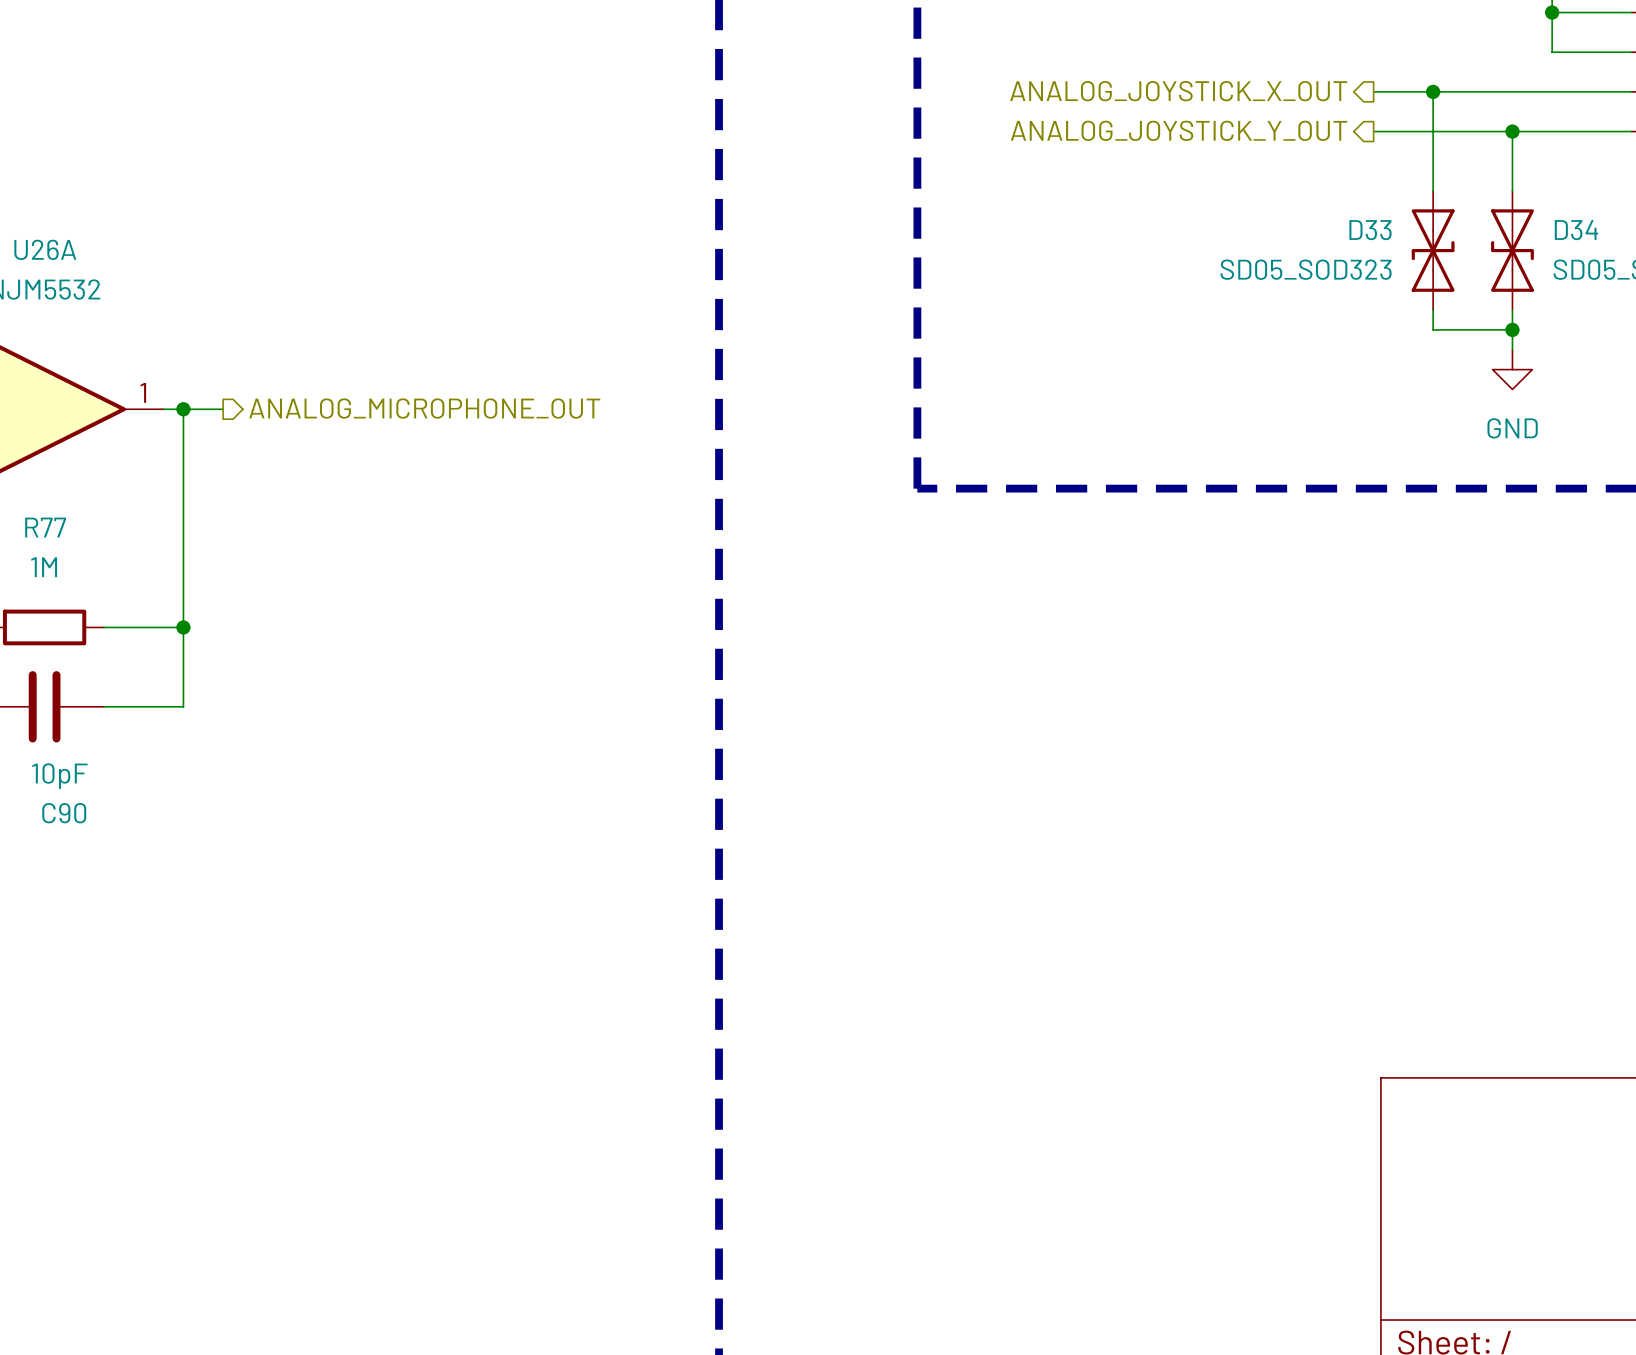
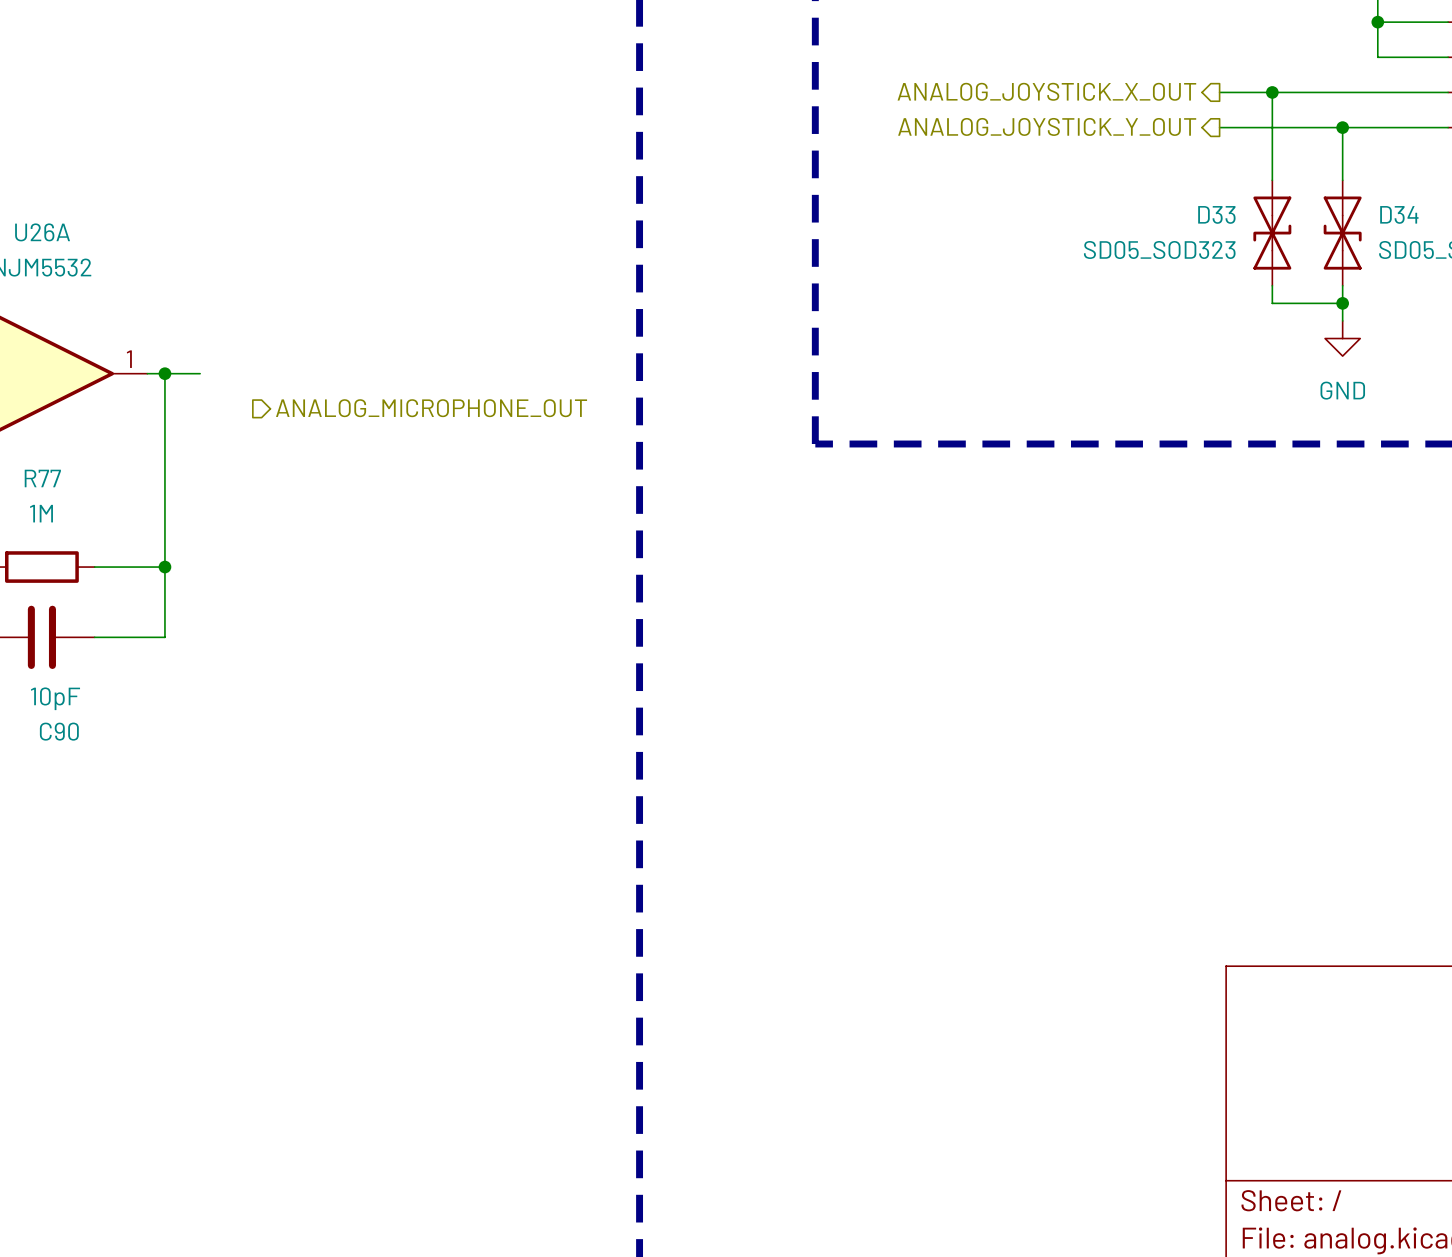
hierarchical label position: ANALOG_MICROPHONE_OUT (424, 408) -> ANALOG_MICROPHONE_OUT (431, 408)

